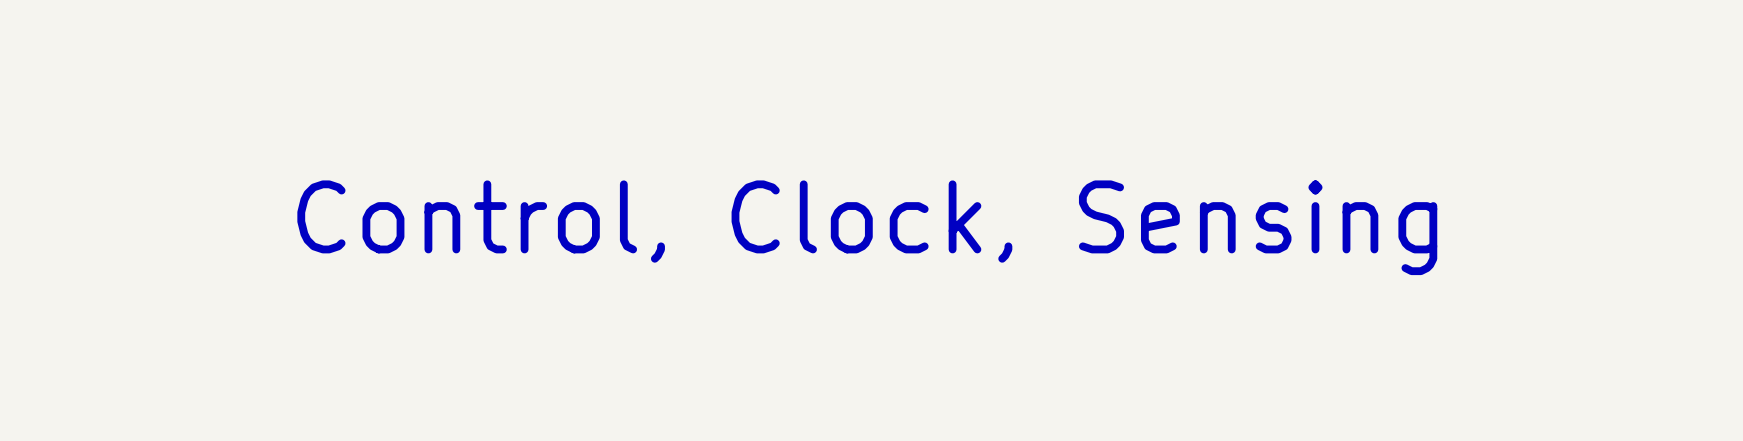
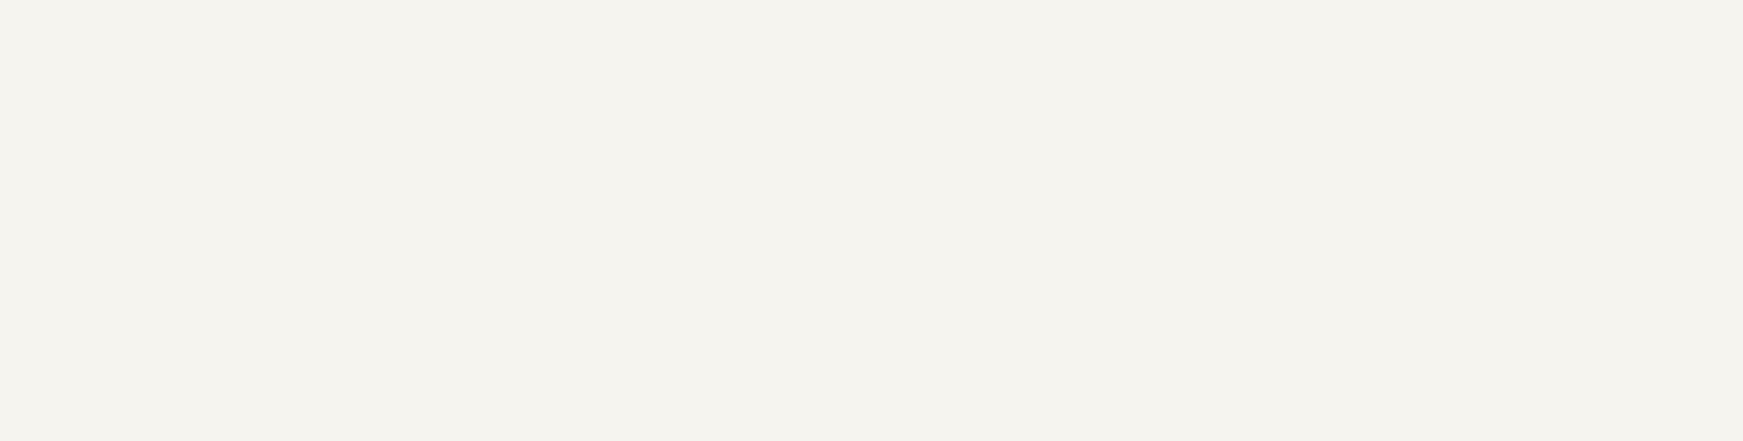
text: Control, Clock, Sensing (867, 227) -> none

